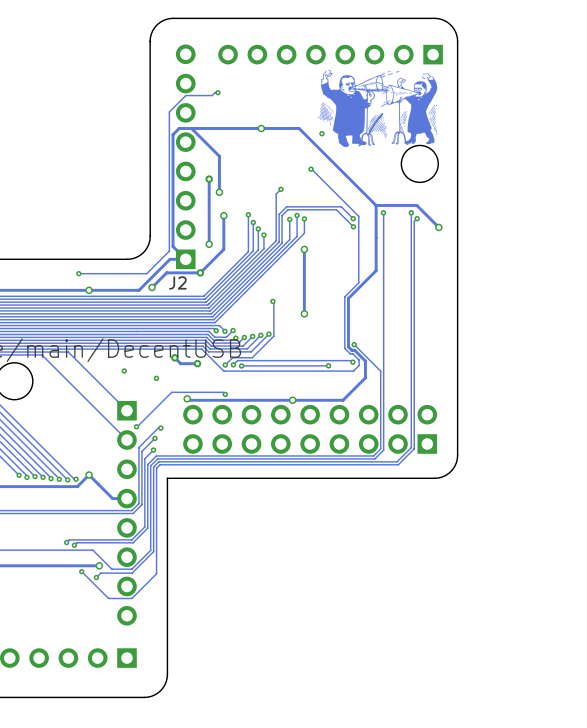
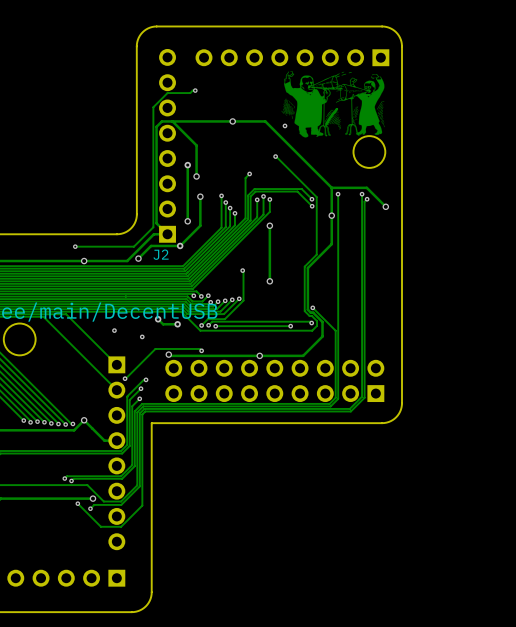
via: none -> (331, 215)

